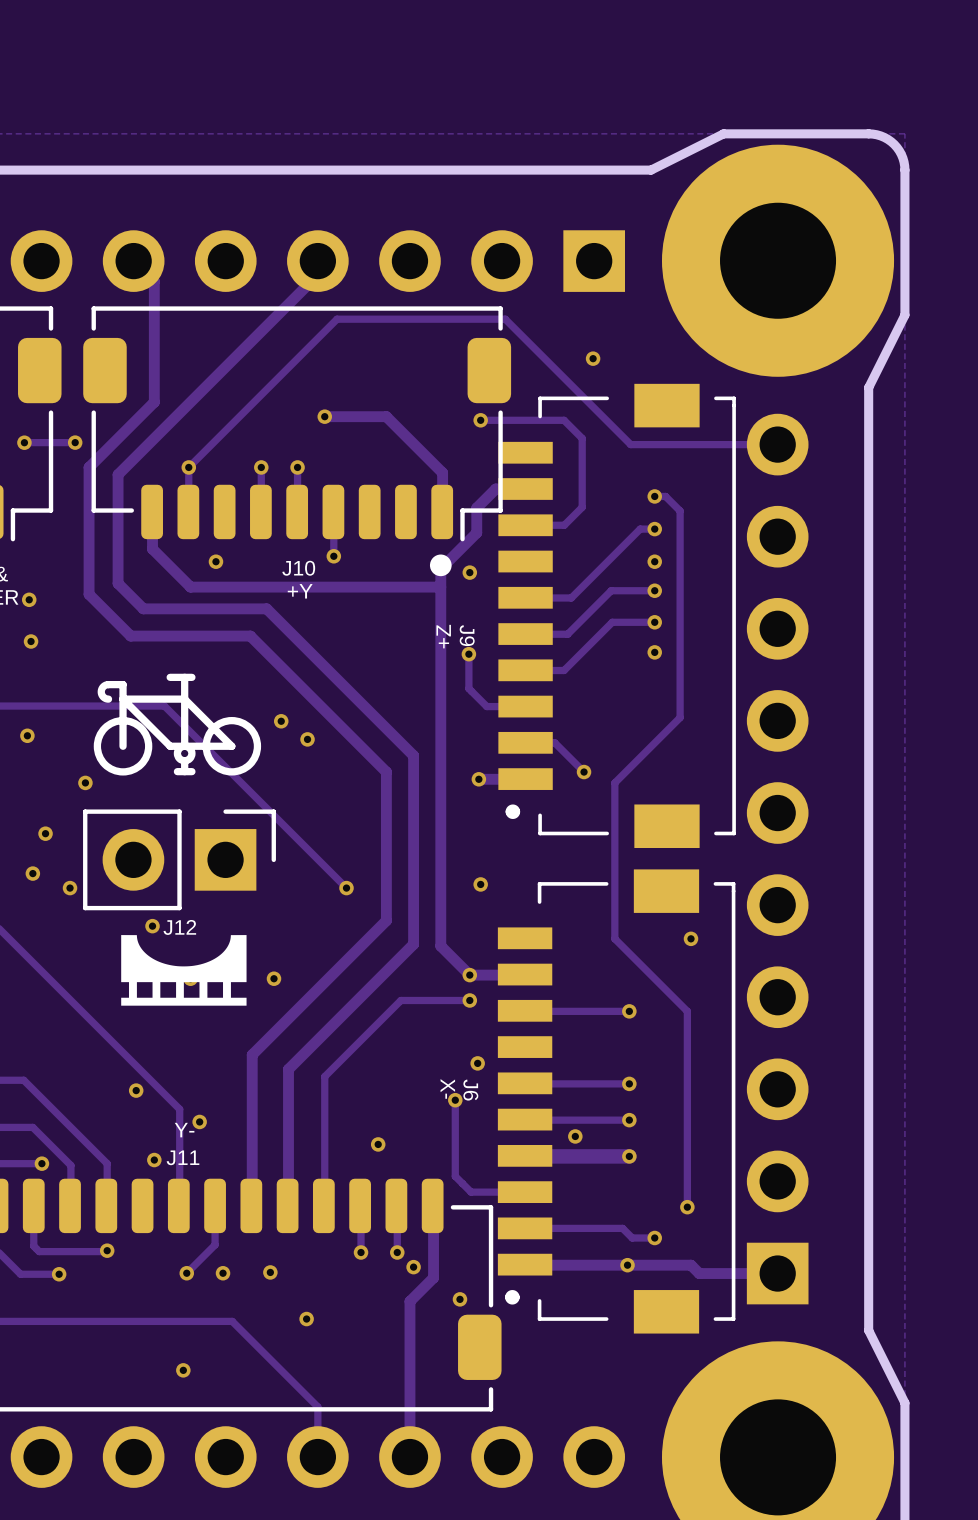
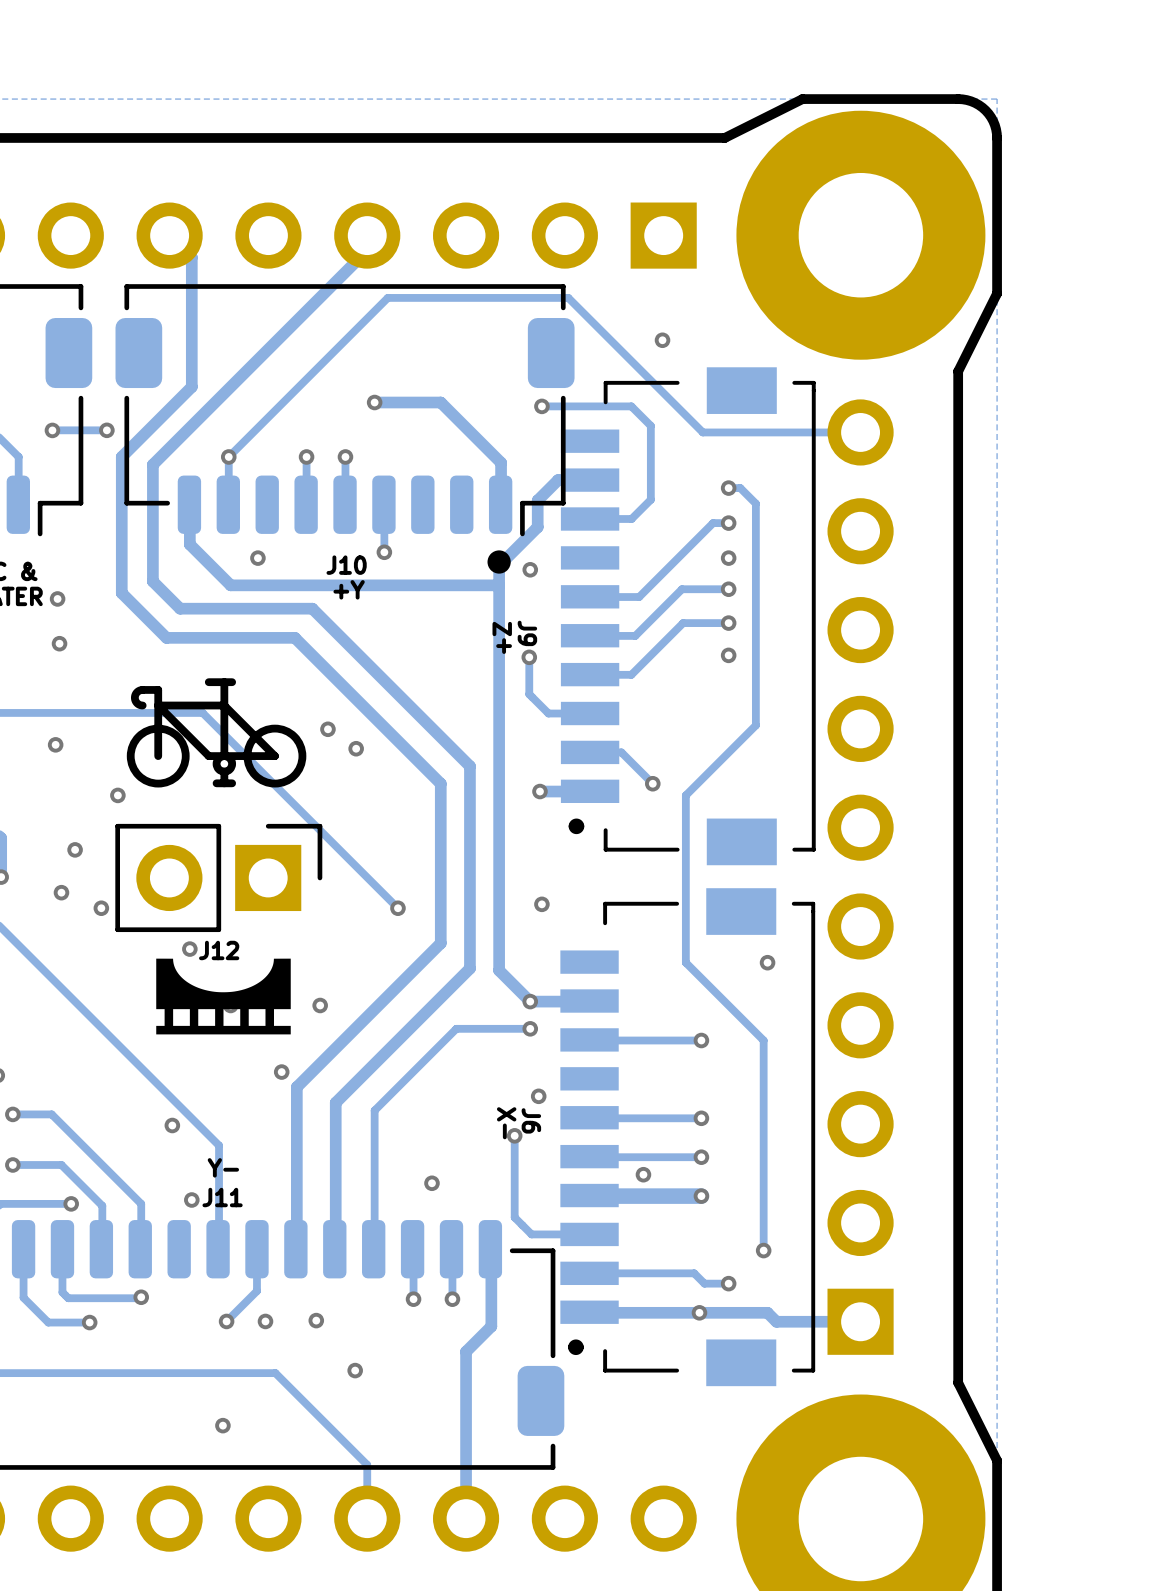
via position: (199, 1121) -> (281, 1072)
via: (413, 1267) -> none
via: (459, 1299) -> none

